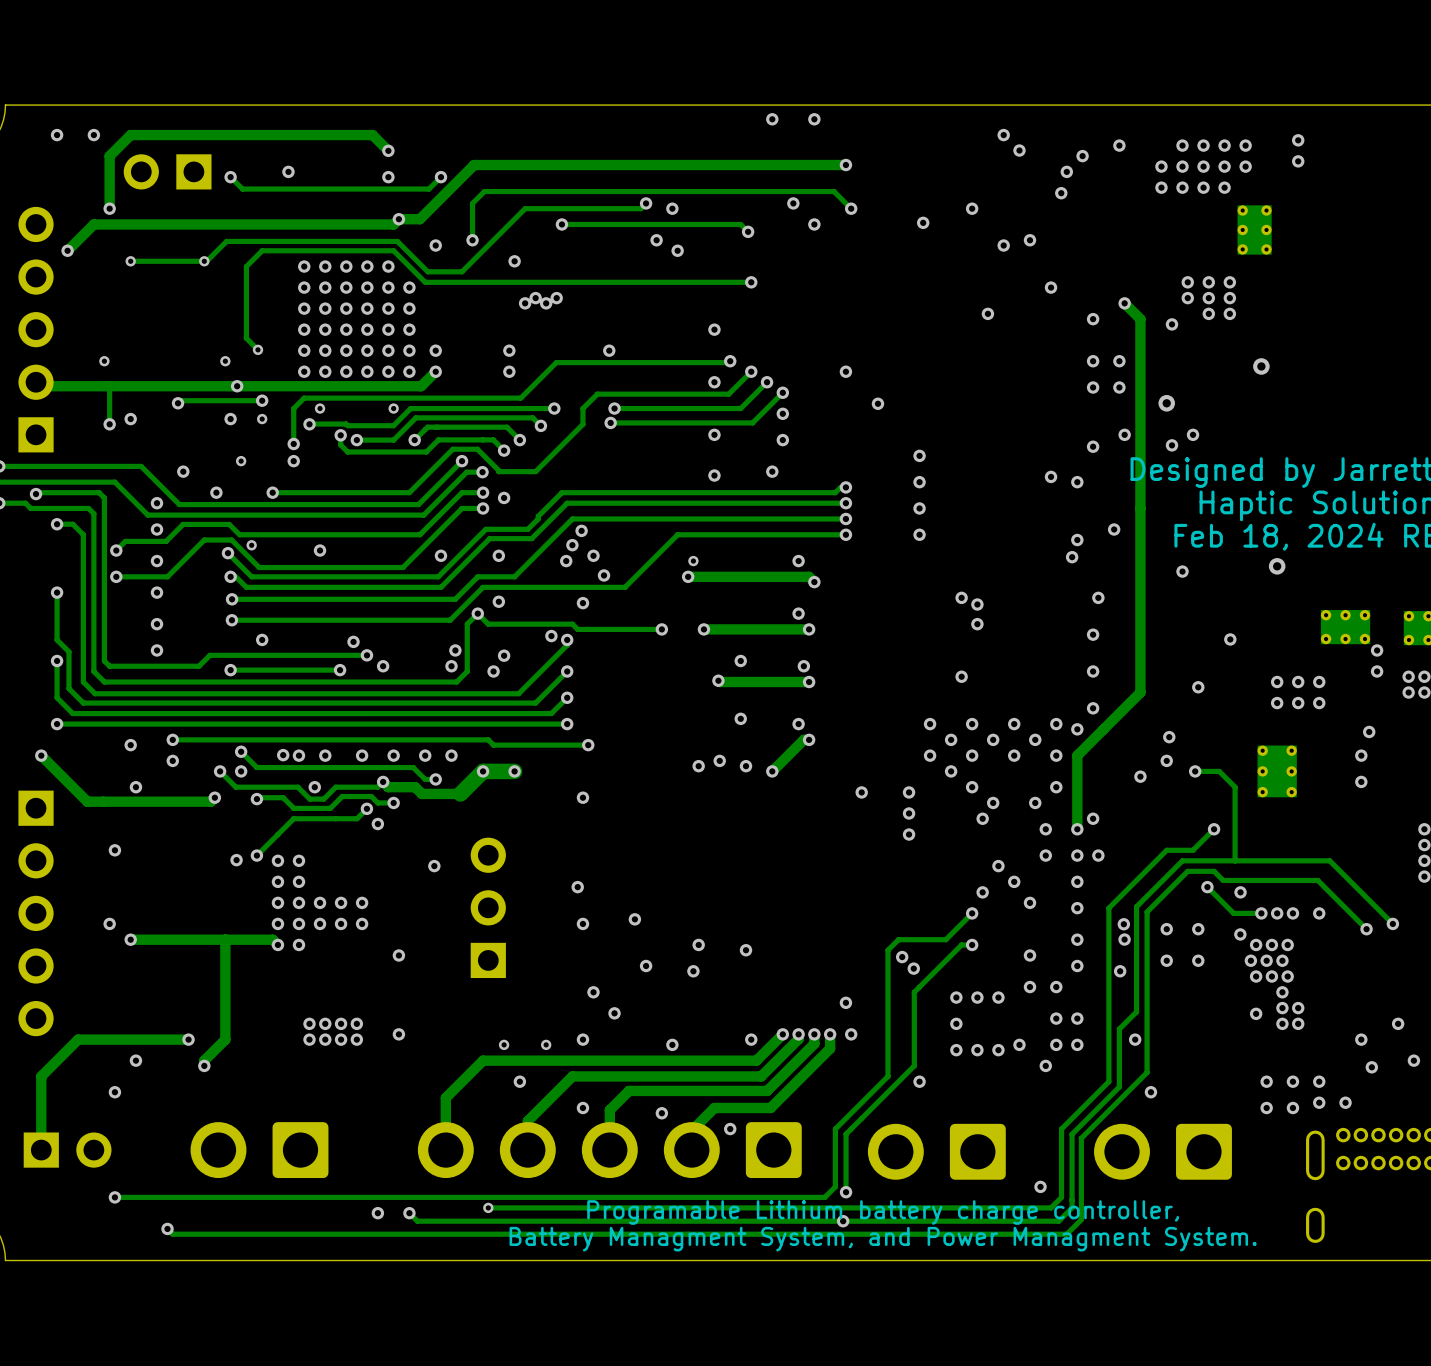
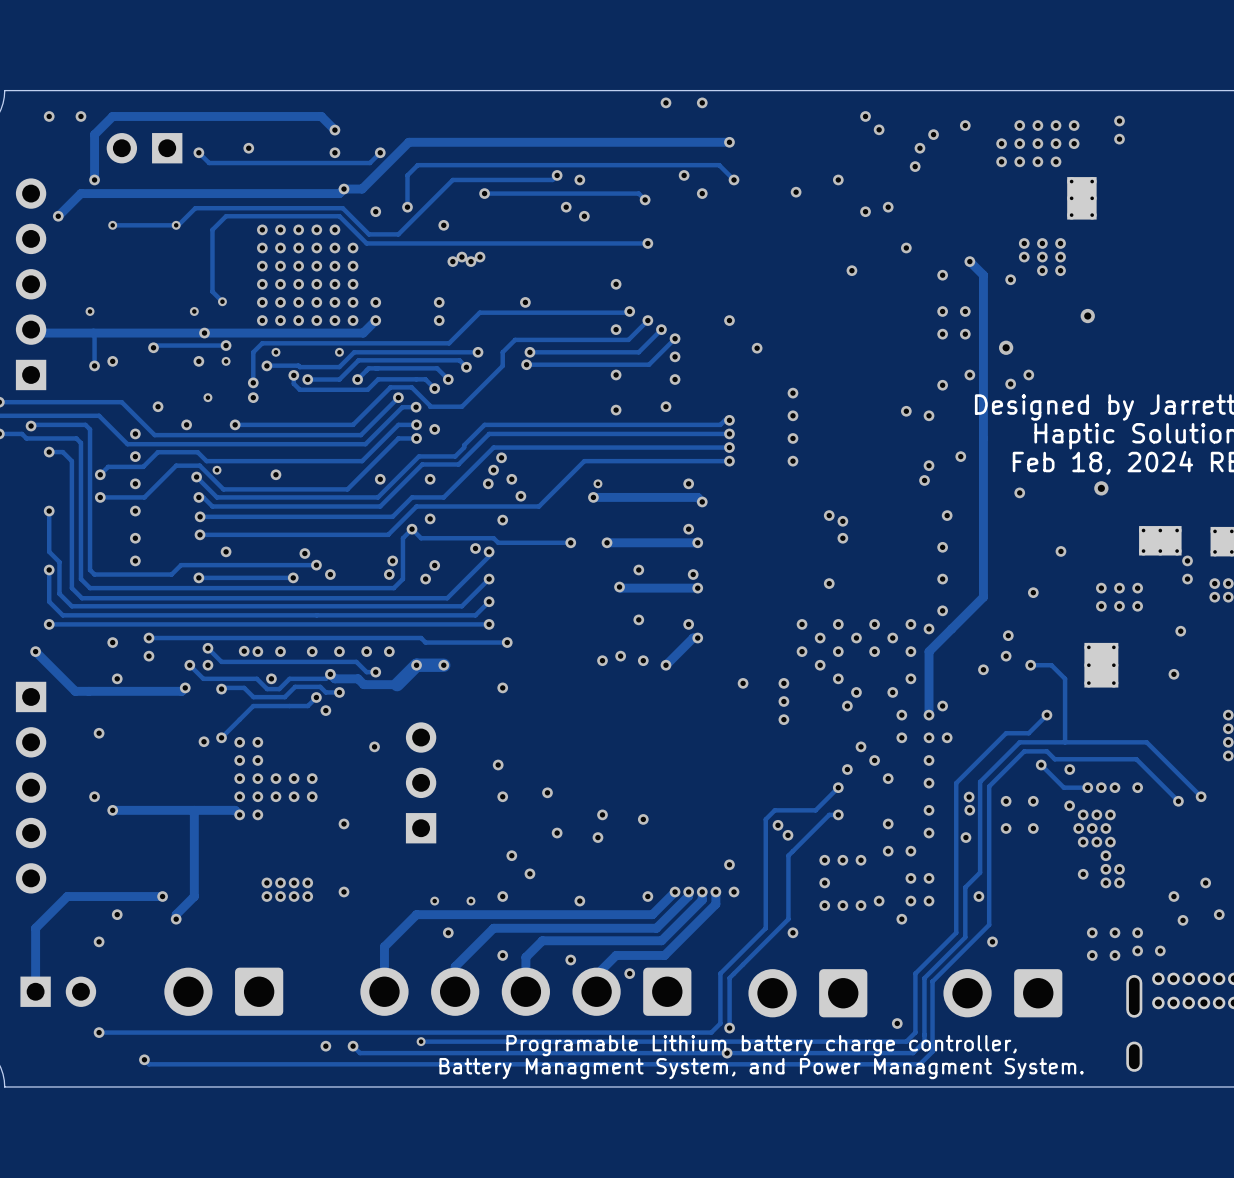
via: (1361, 755) -> none

